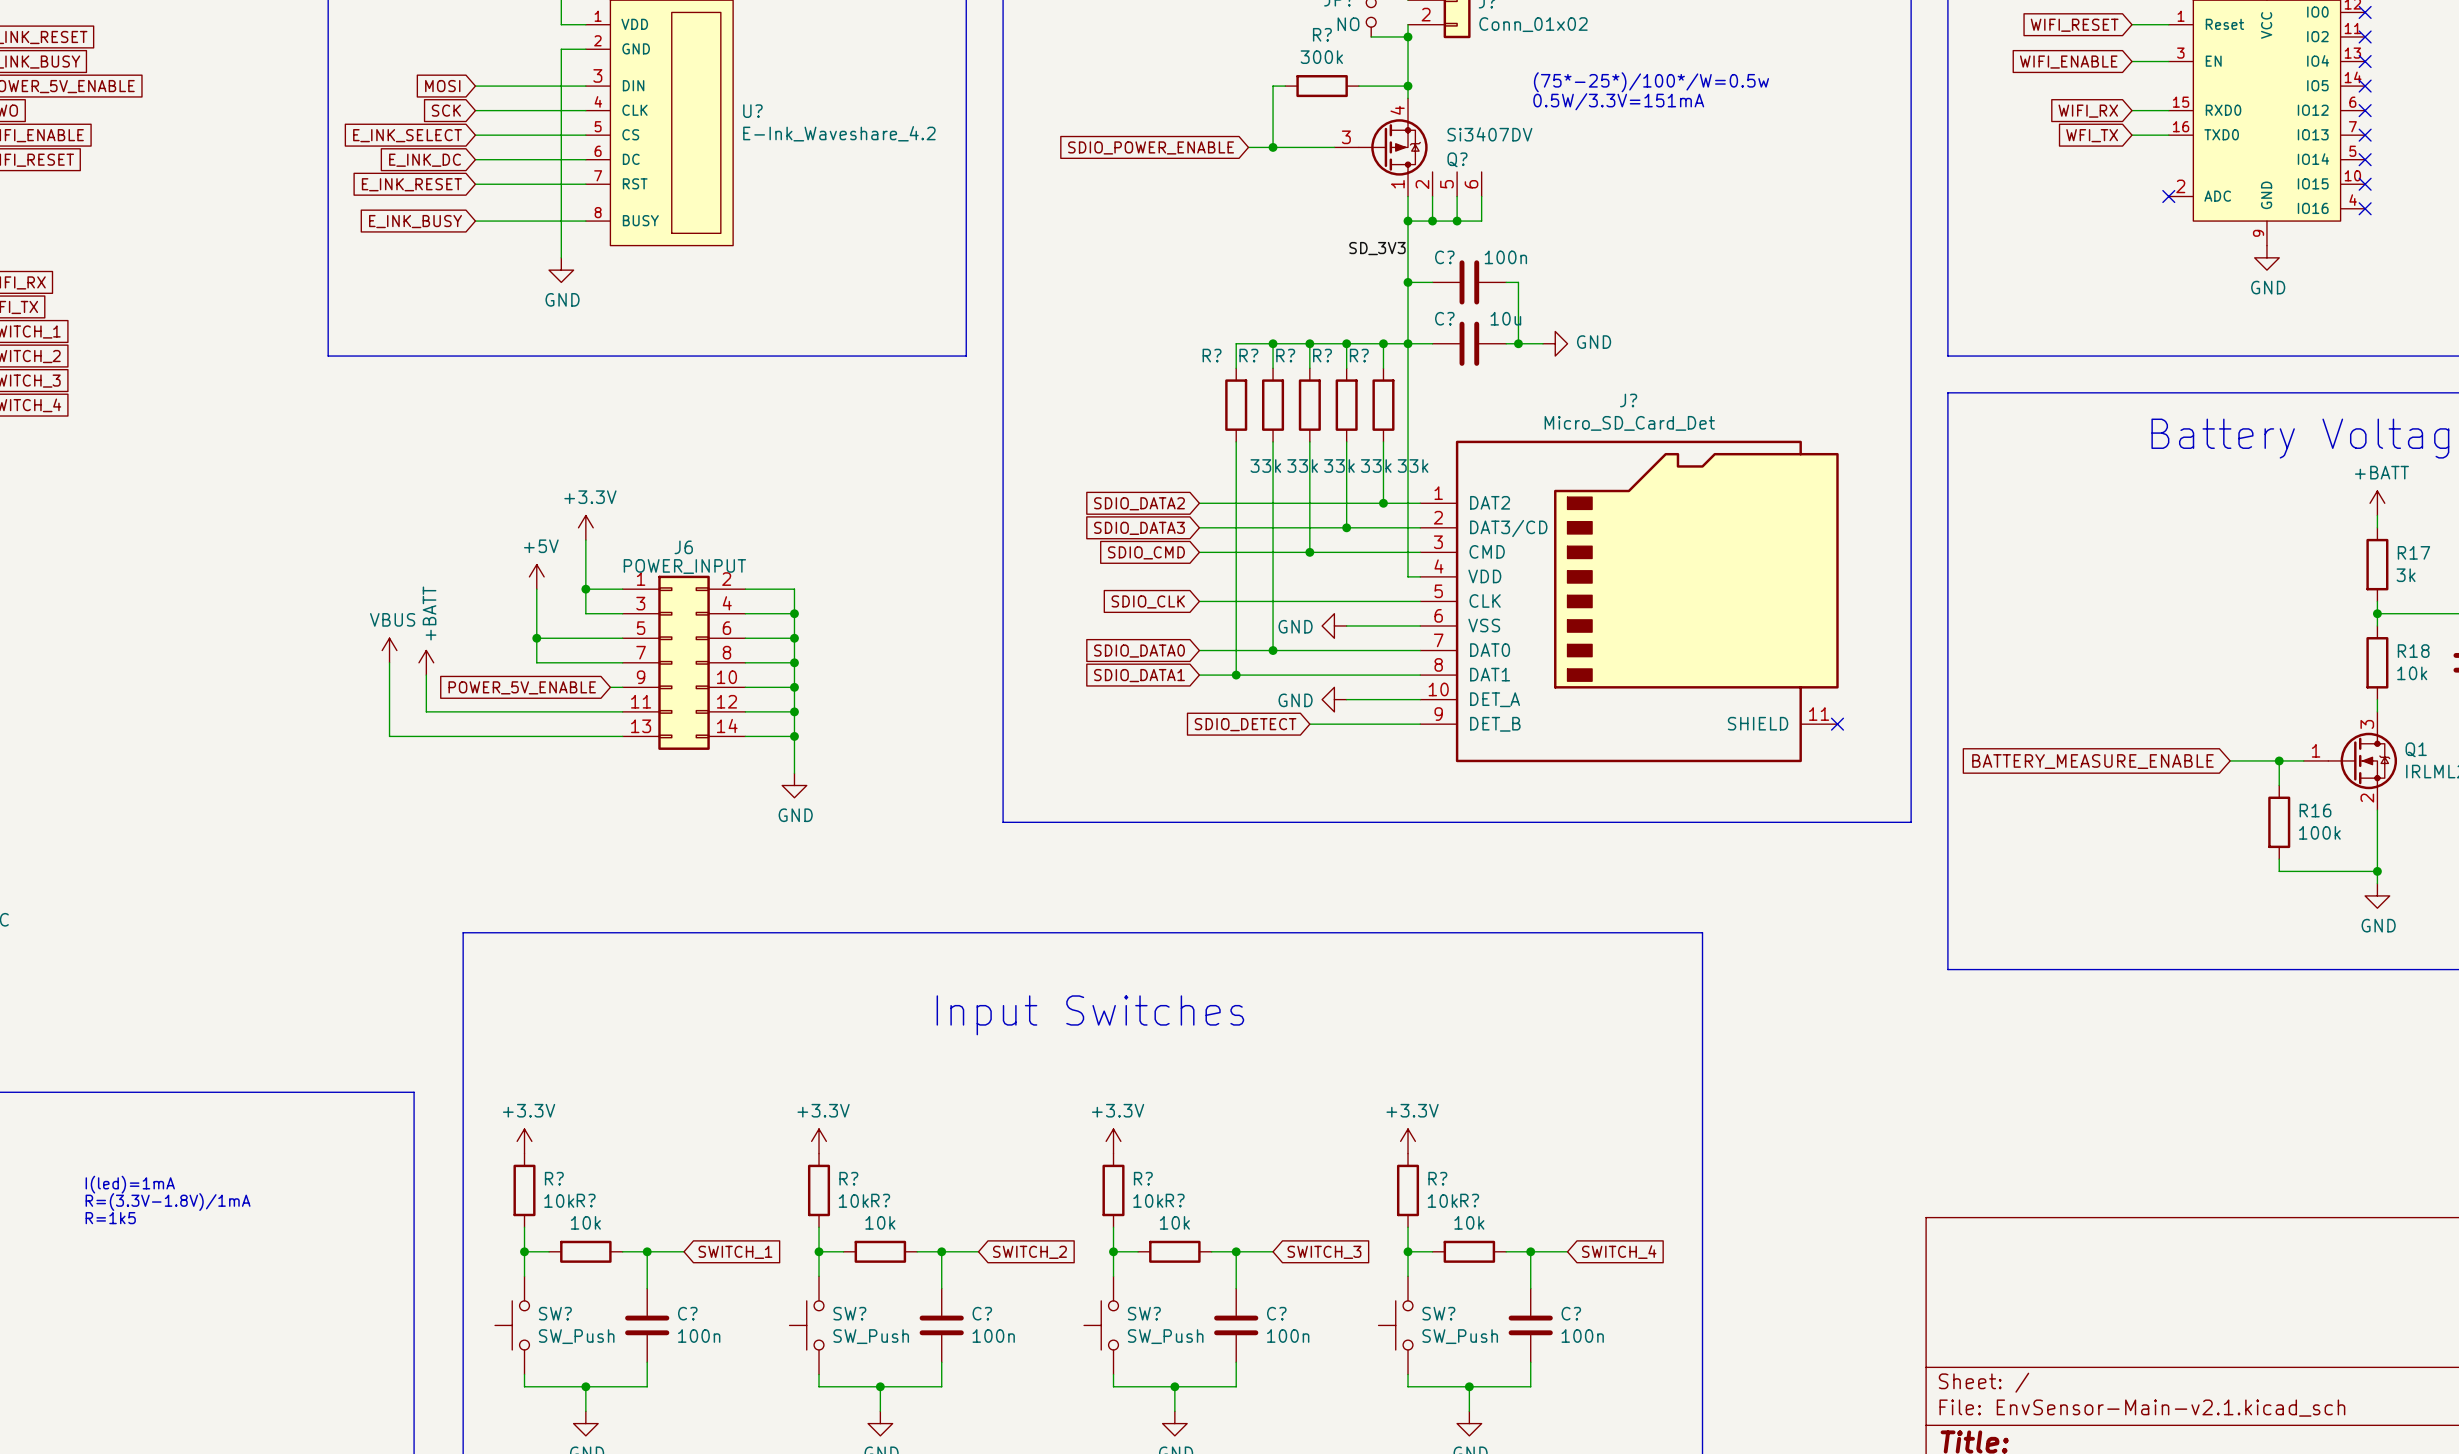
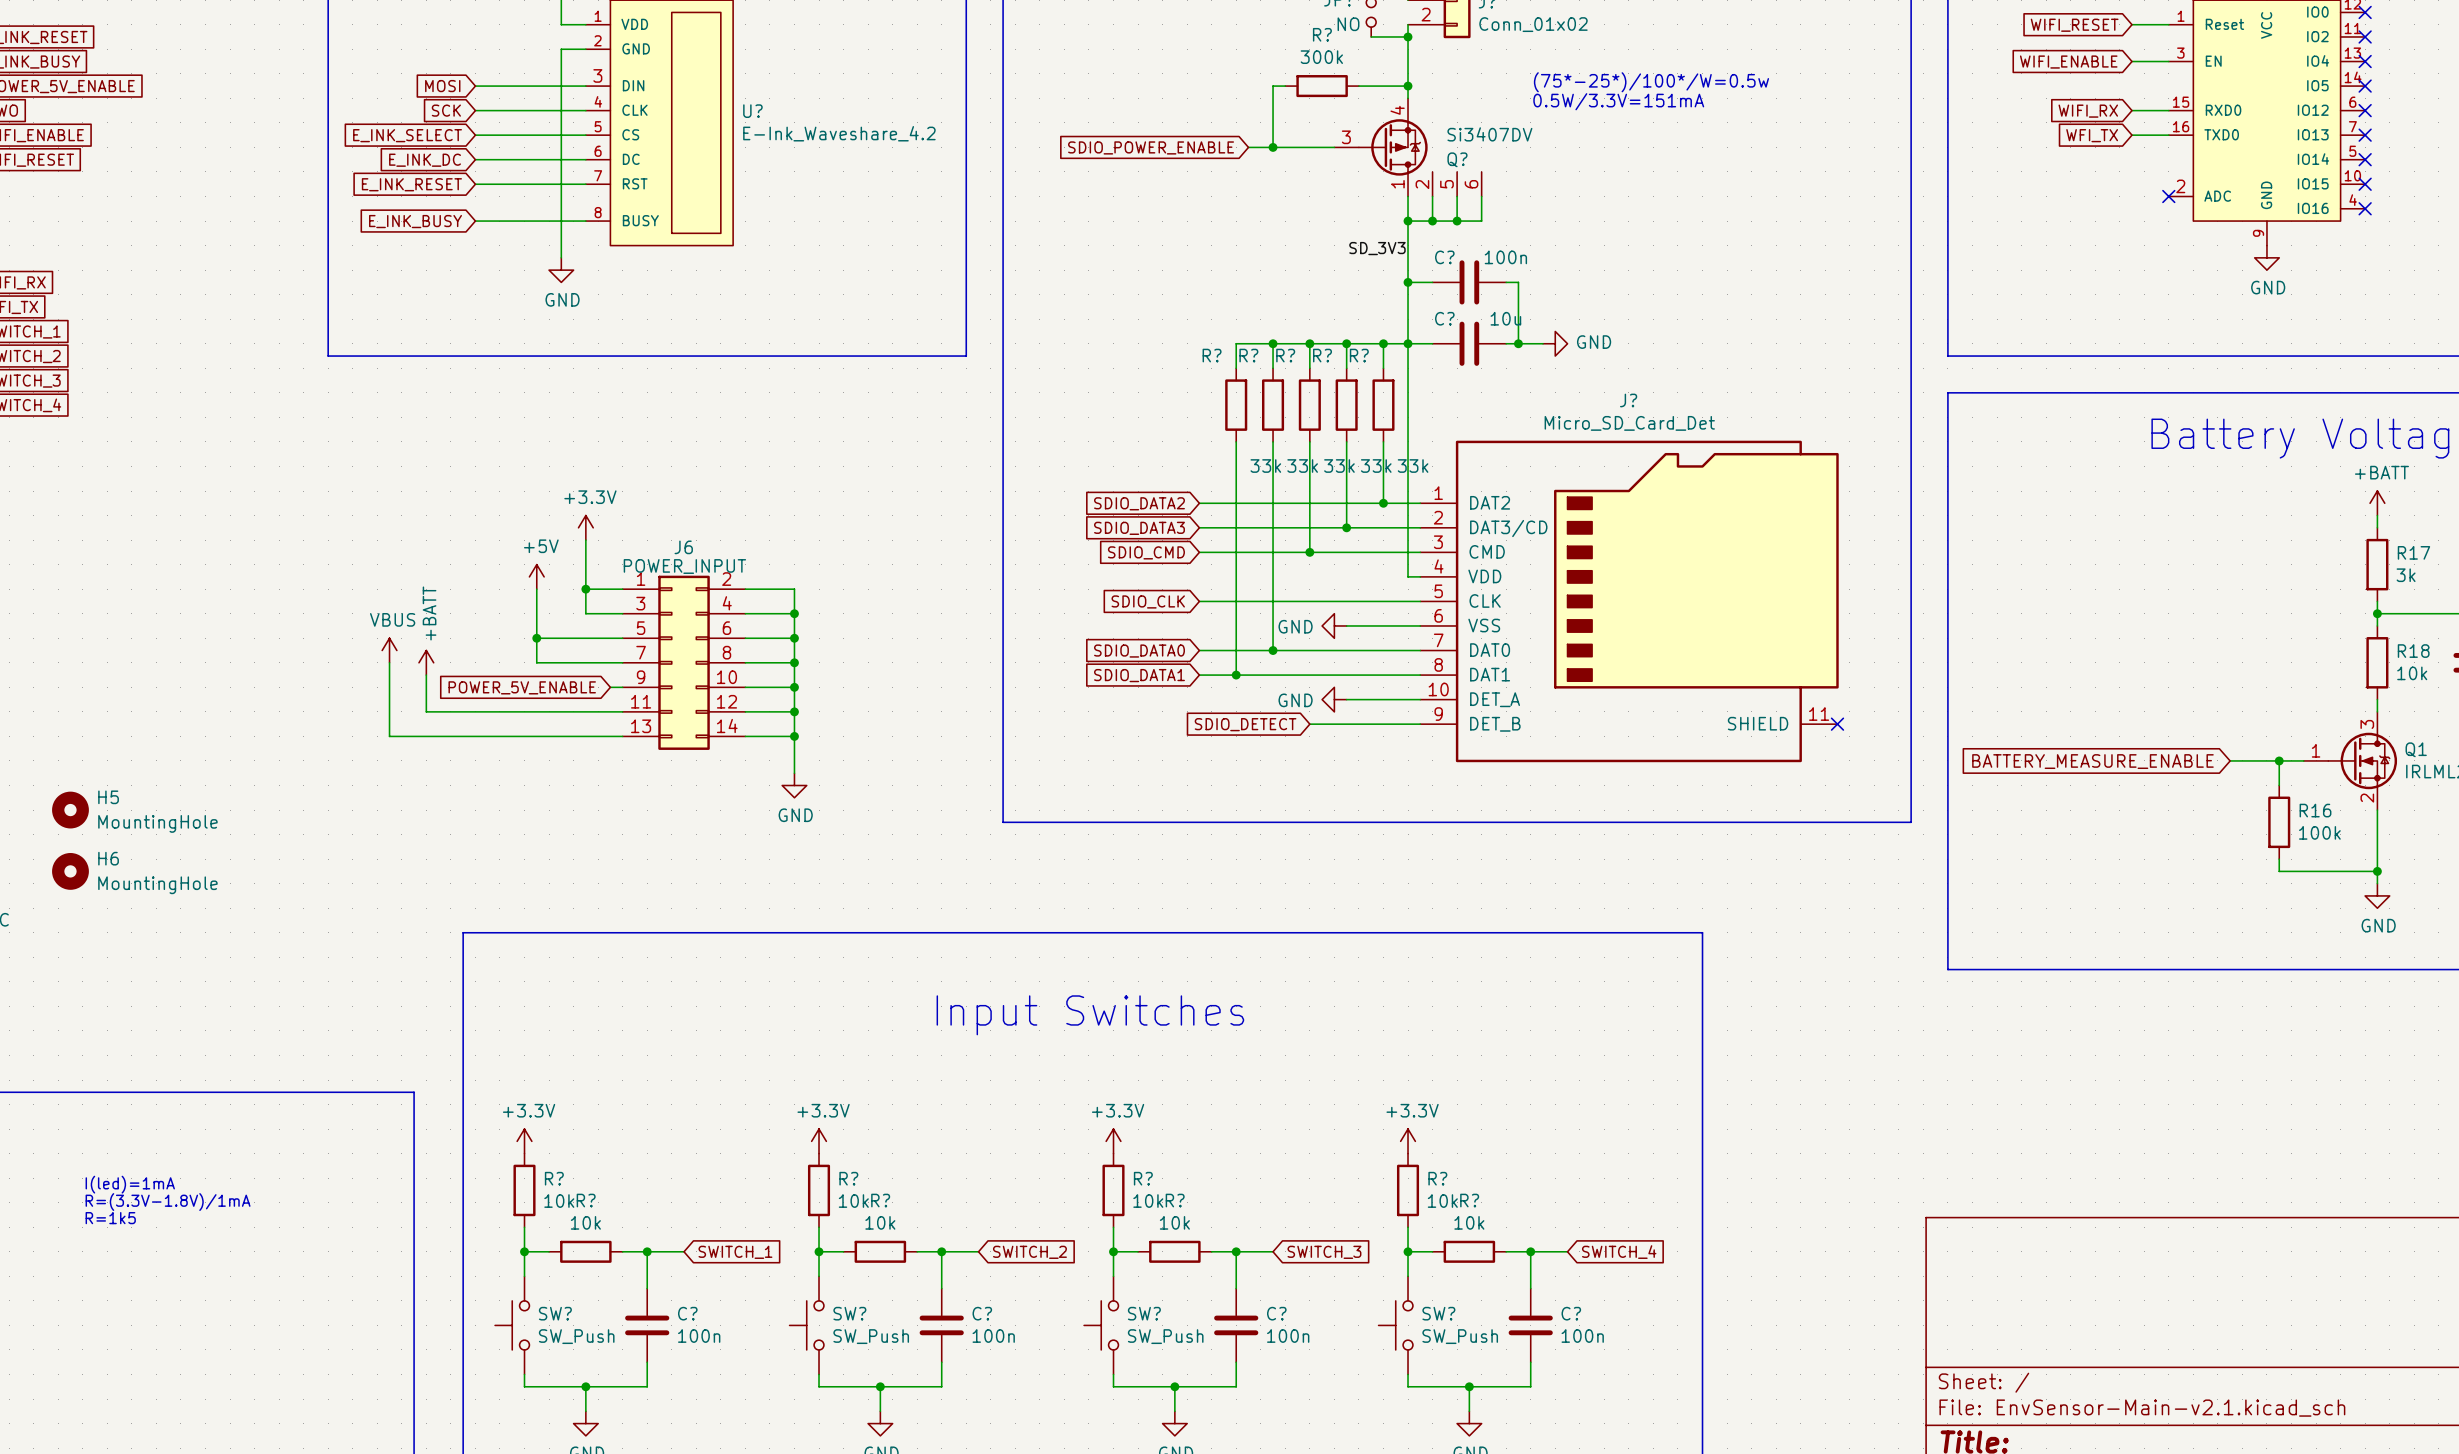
H5: none -> MountingHole (70, 810)
H6: none -> MountingHole (70, 871)

